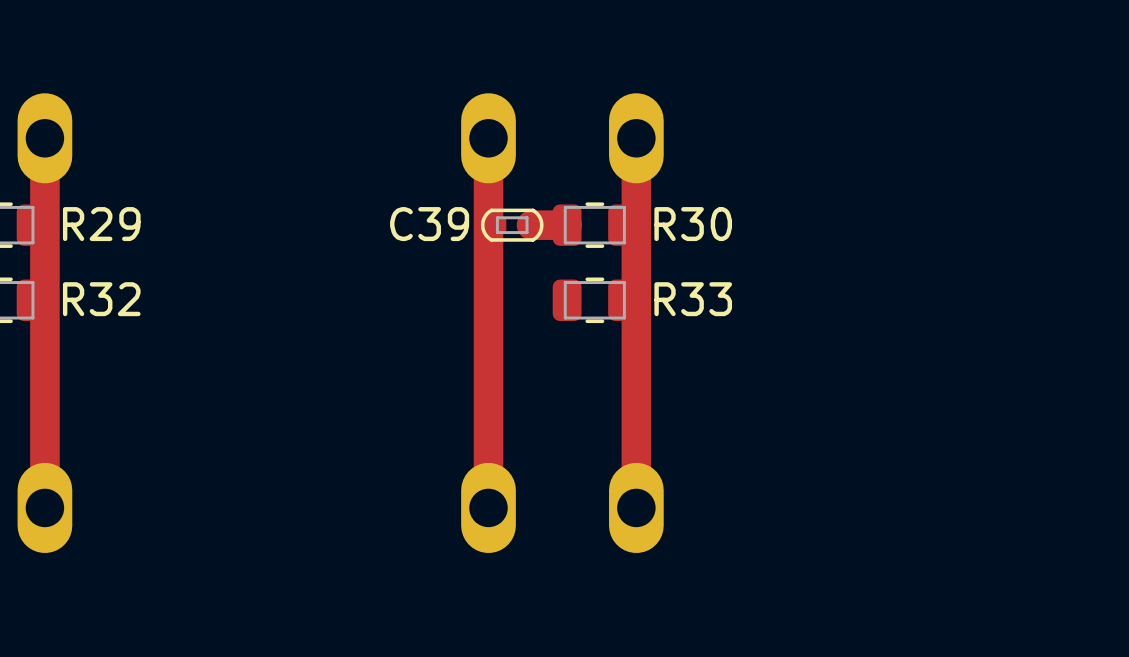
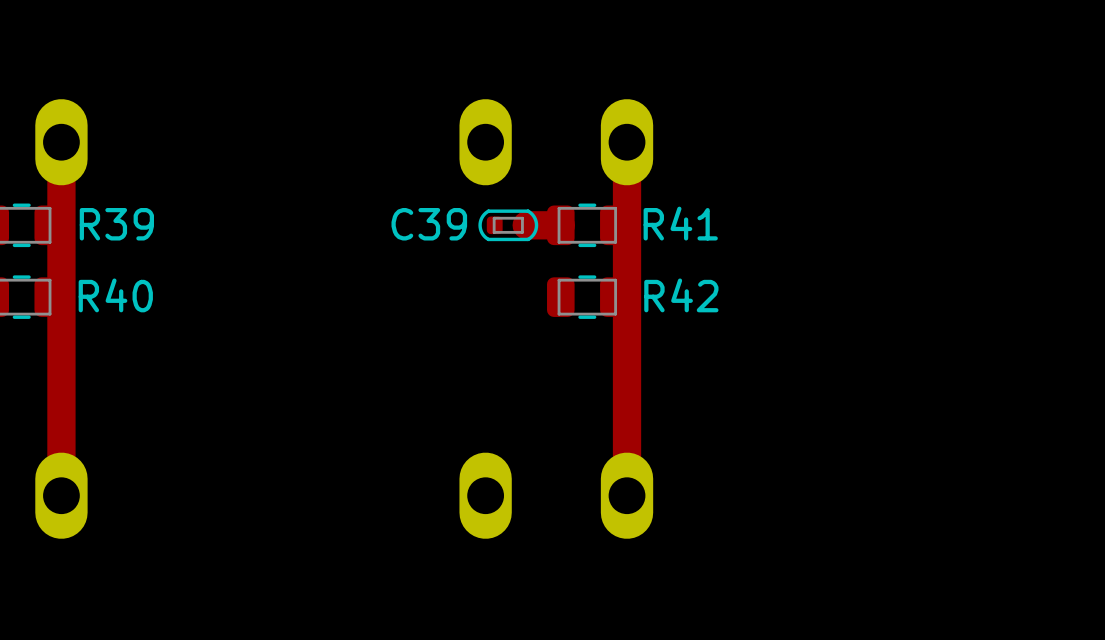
track: (488, 138) (488, 507) -> none
R29 name: R29 (101, 224) -> R39 (116, 224)
R30 name: R30 (693, 224) -> R41 (680, 223)
R32 name: R32 (101, 299) -> R40 (115, 295)
R33 name: R33 (693, 299) -> R42 (681, 295)

